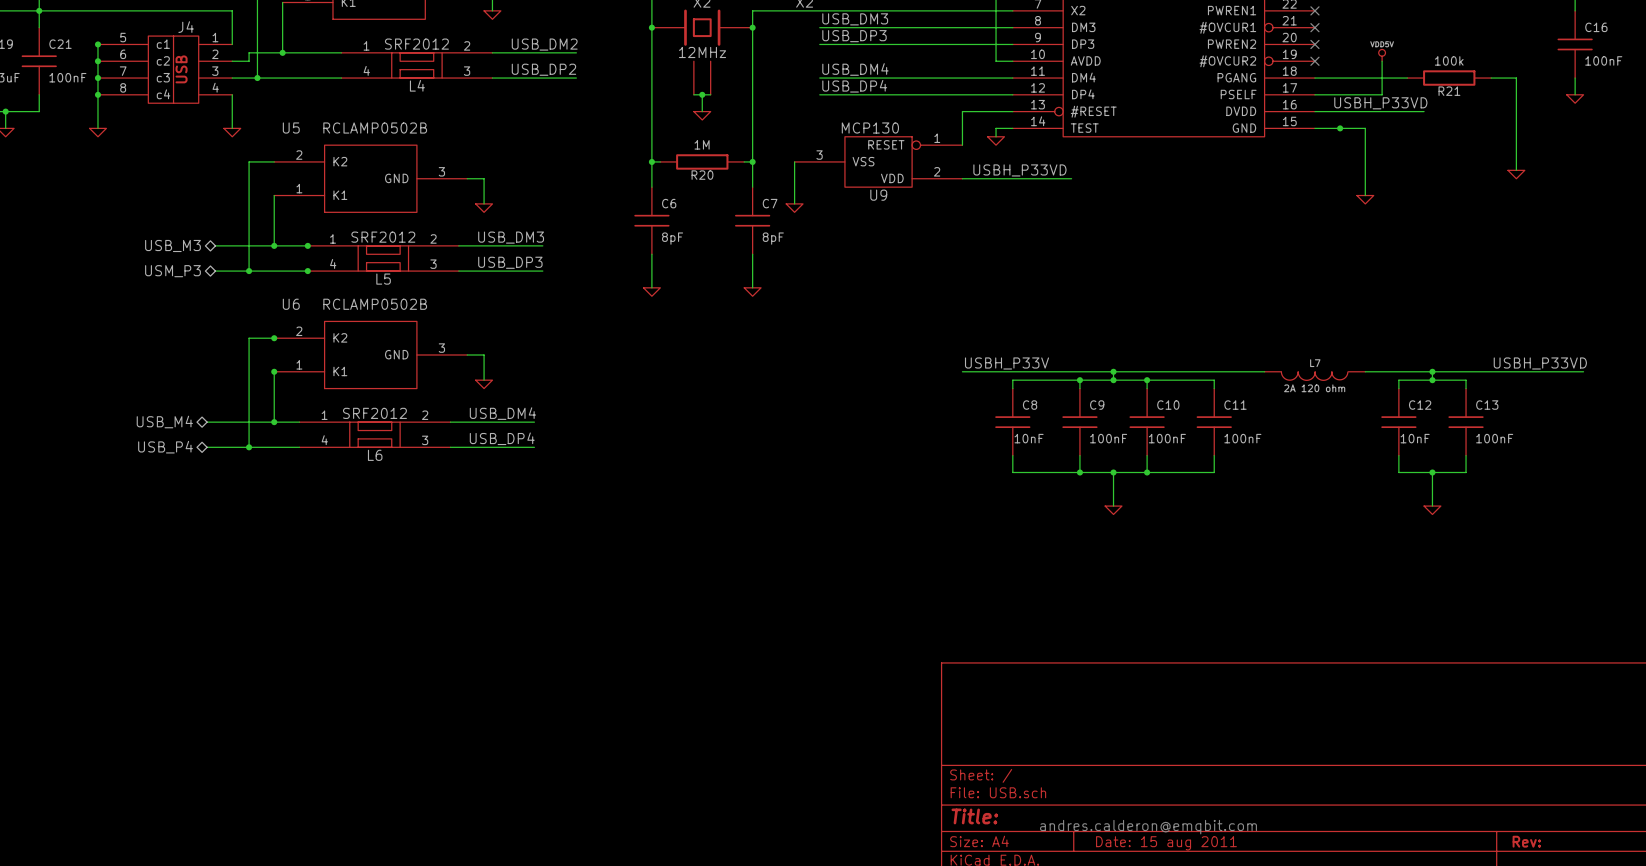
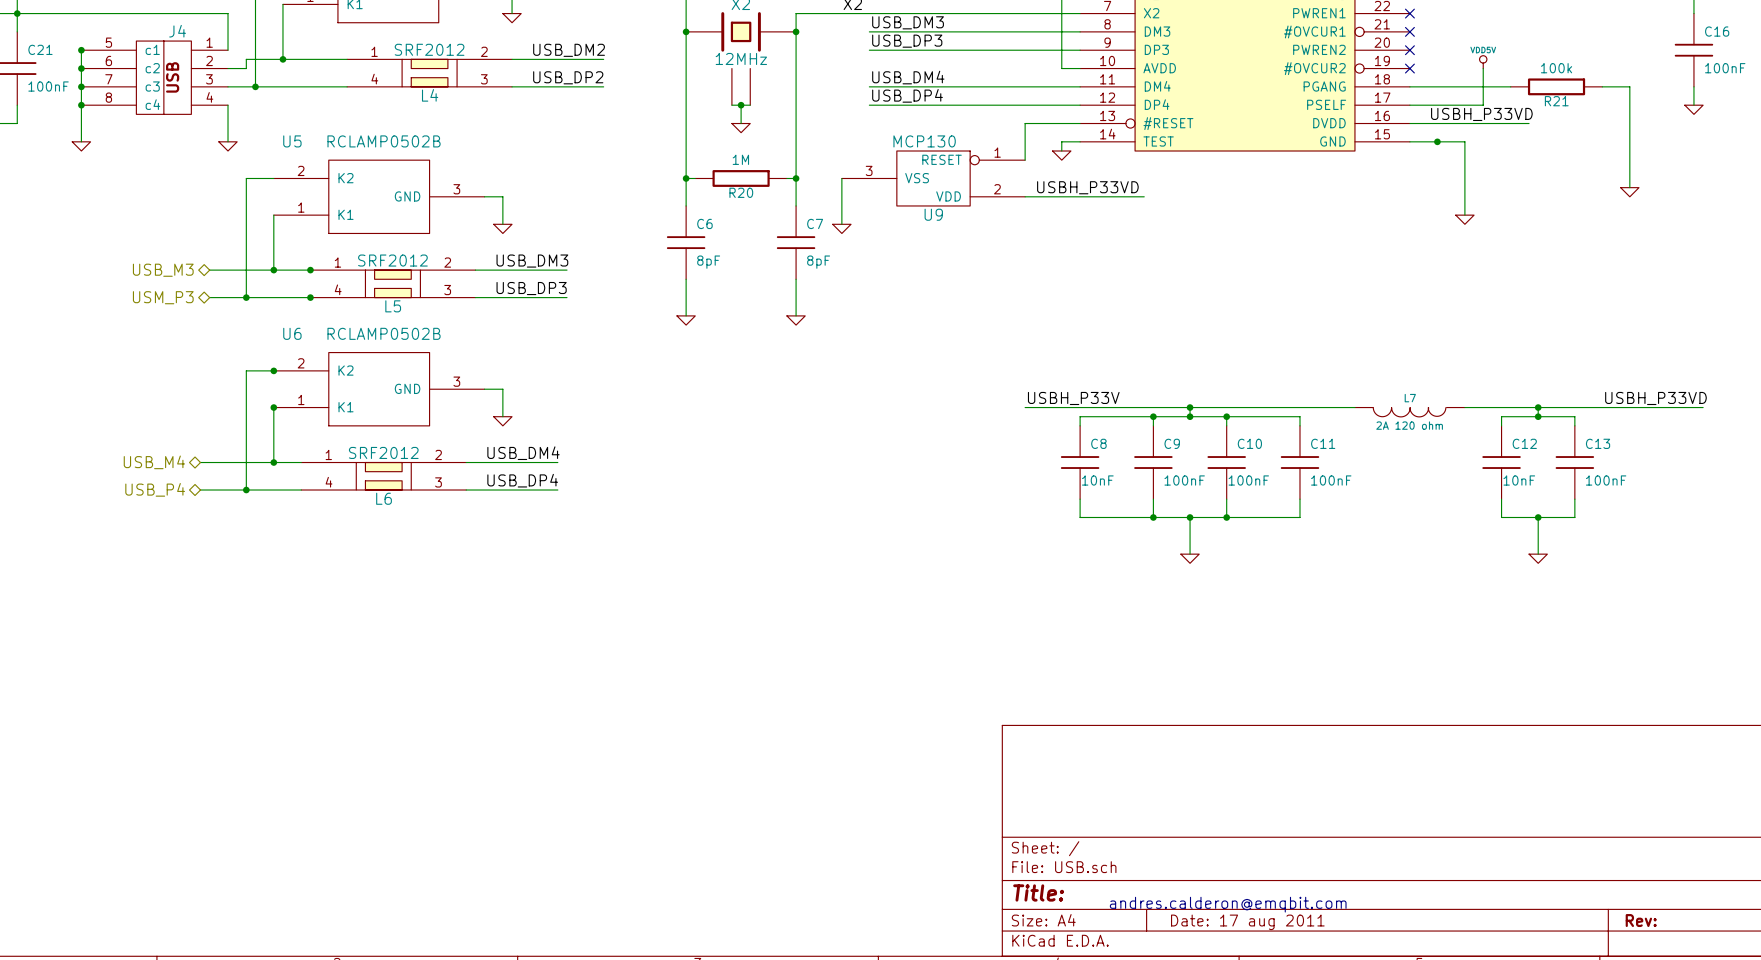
title block: Date: 15 aug 2011 (1166, 843) -> Date: 17 aug 2011 (1247, 922)

